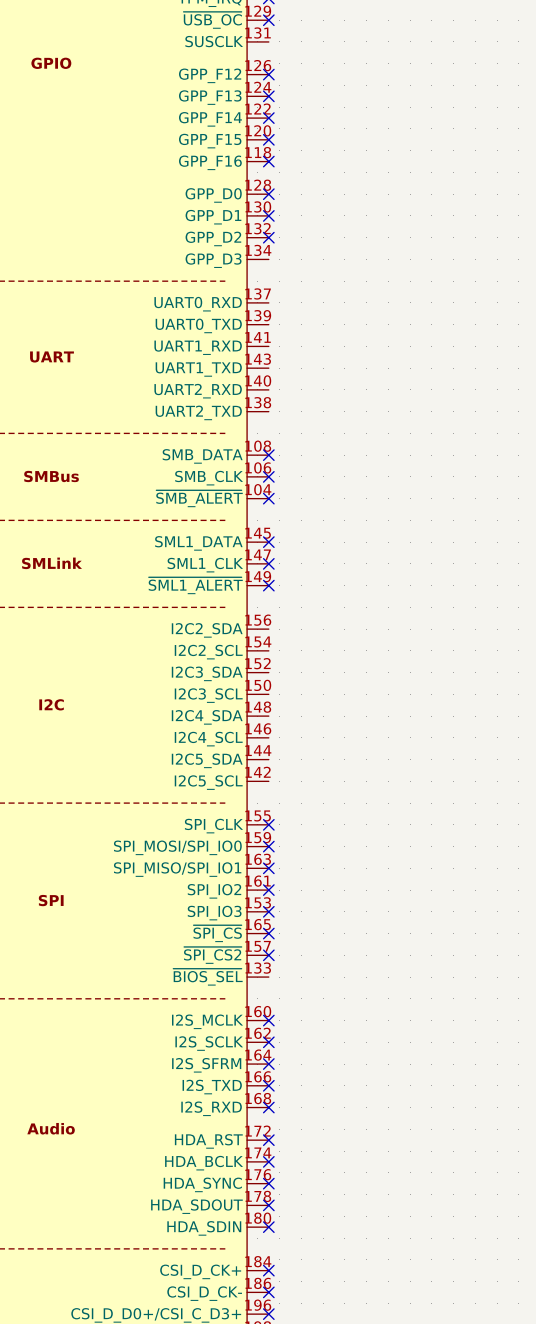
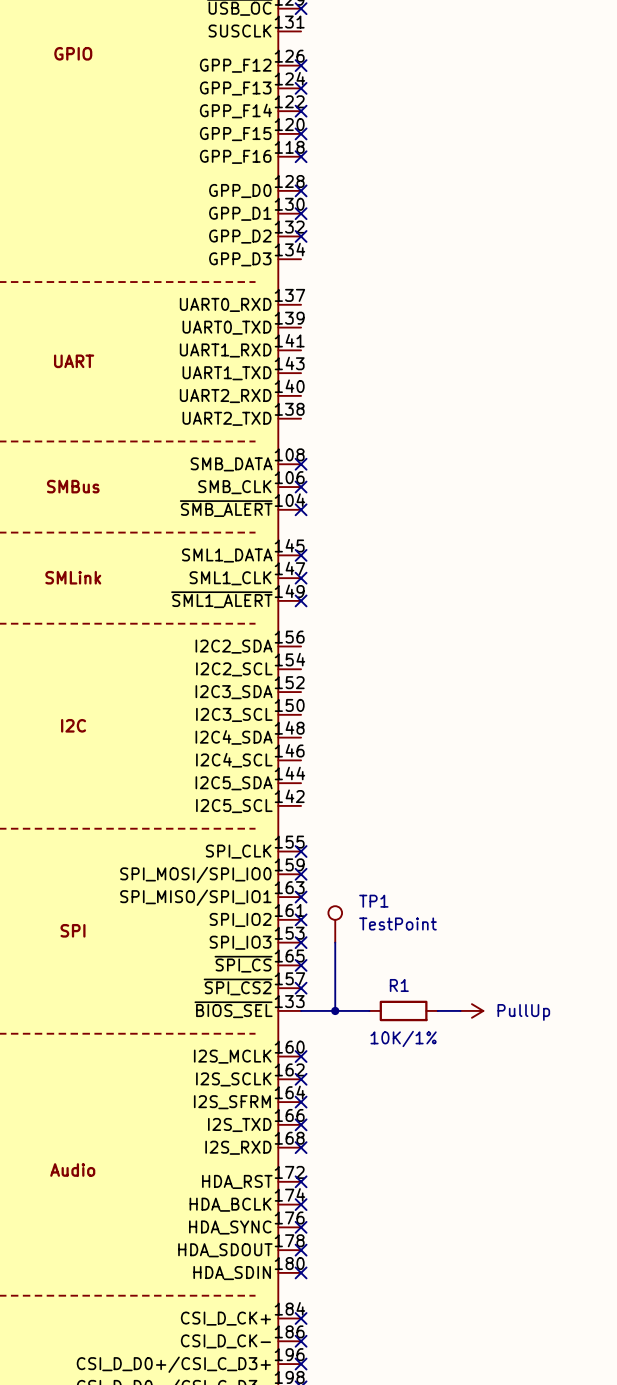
TP1: none -> TestPoint (335, 924)
wire: none -> (335, 942) (335, 1010)
wire: none -> (301, 1010) (369, 1010)
junction: none -> (335, 1010)
R1: none -> 10K/1% (403, 1010)
wire: none -> (437, 1010) (460, 1010)
power symbol: none -> PullUp (471, 1010)

